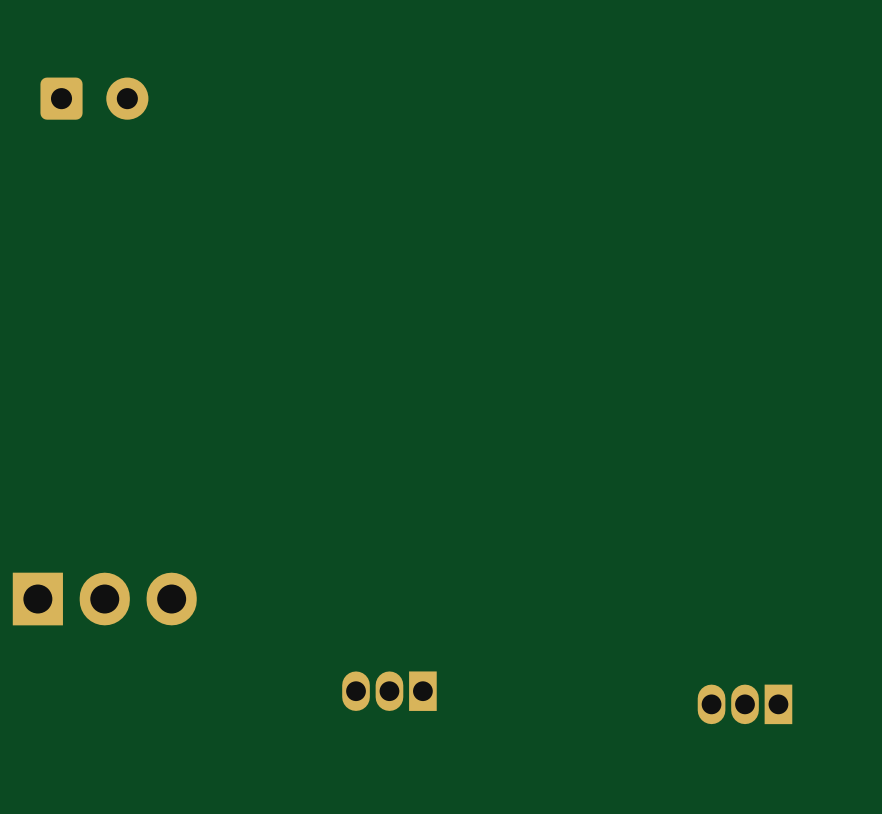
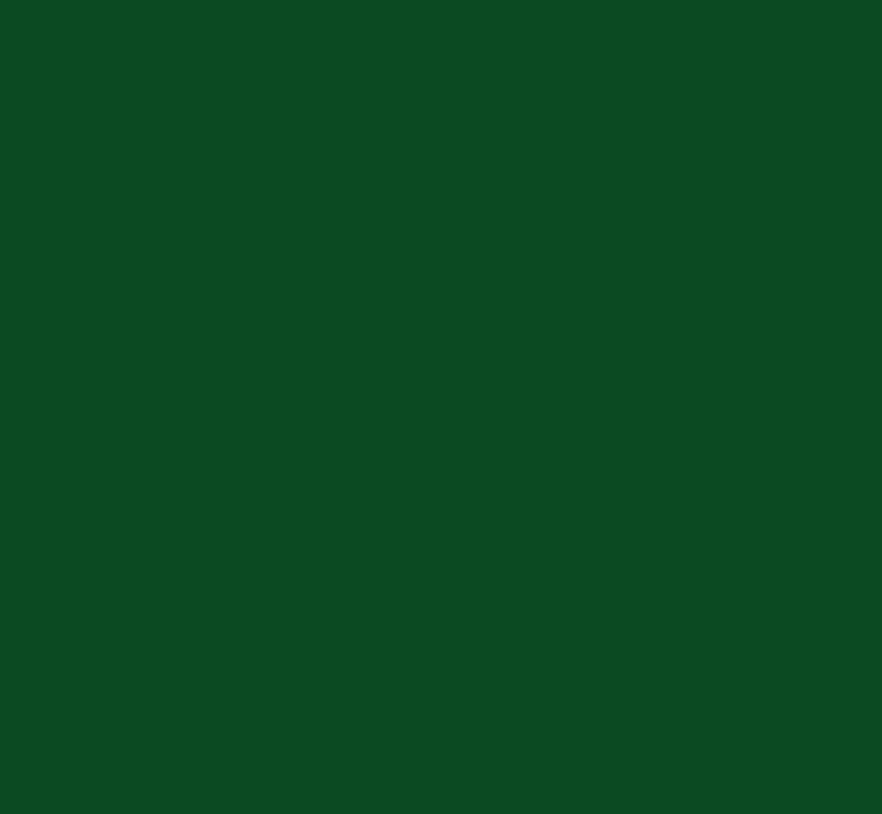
part: (94, 98) -> none
part: (104, 599) -> none
part: (389, 691) -> none
part: (745, 704) -> none

